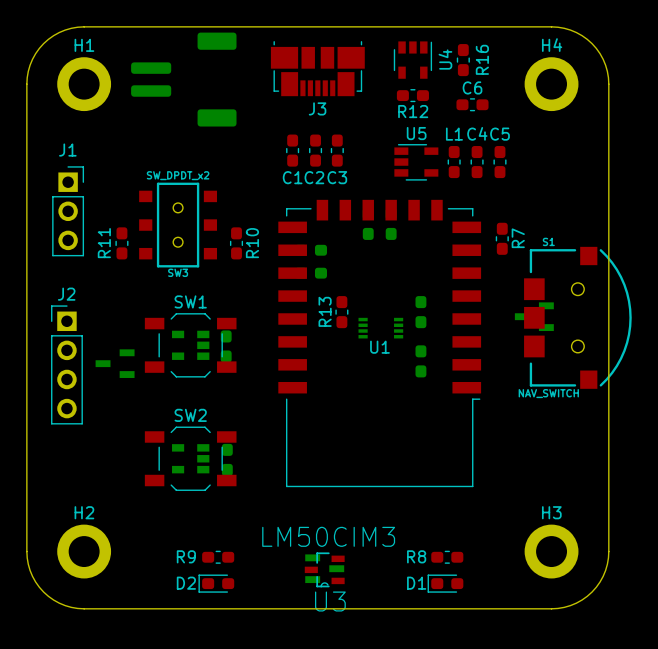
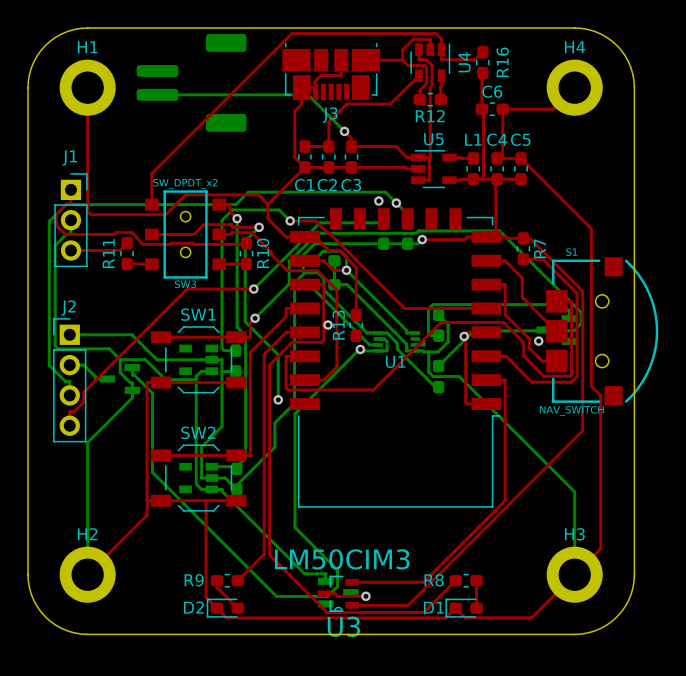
top track: none -> (418, 49) (418, 59) (426, 59) (432, 65) (429, 157)
top track: none -> (430, 49) (430, 39) (413, 39) (402, 49) (402, 60)
top track: none -> (482, 52) (475, 59) (441, 59) (441, 39) (435, 33) (291, 33) (151, 173) (151, 204)
top track: none -> (341, 60) (341, 75) (321, 75) (314, 82) (314, 87)
top track: none -> (402, 60) (408, 65) (424, 65) (426, 67) (426, 83) (419, 90) (419, 99)
top track: none -> (402, 60) (365, 60) (365, 65) (360, 71)
top track: none -> (482, 73) (483, 179)
top track: none -> (418, 75) (390, 104) (346, 104) (328, 122) (328, 146) (304, 146)
top track: none -> (441, 75) (440, 99)
top track: none -> (87, 87) (87, 211) (90, 214) (165, 214) (185, 194) (258, 194) (267, 204)
top track: none -> (314, 87) (301, 87) (301, 104) (294, 111) (294, 157) (304, 167)
top track: none -> (574, 87) (553, 109) (502, 109) (502, 158)
bottom track: none -> (157, 94) (307, 94) (344, 131)
top track: none -> (344, 131) (351, 138) (351, 146) (396, 146) (407, 157) (429, 157)
via: none -> (344, 131)
top track: none -> (429, 157) (429, 180) (418, 180)
top track: none -> (449, 157) (473, 158)
top track: none -> (497, 158) (521, 158) (591, 228) (591, 386) (600, 395) (600, 548) (531, 617) (465, 617) (455, 608) (445, 617) (226, 617) (206, 597) (206, 500)
top track: none -> (304, 167) (418, 168)
top track: none -> (304, 167) (267, 204)
top track: none -> (497, 179) (495, 236)
top track: none -> (521, 179) (449, 180)
top track: none -> (70, 189) (70, 203) (66, 203) (56, 214) (56, 225) (65, 234) (132, 232) (143, 244) (246, 243)
via: none -> (378, 201)
via: none -> (396, 203)
top track: none -> (219, 204) (230, 204) (230, 211) (237, 218)
top track: none -> (267, 204) (267, 218) (286, 236) (314, 236) (328, 250) (338, 250) (356, 267) (356, 314)
bottom track: none -> (237, 218) (237, 327) (245, 335) (245, 457) (236, 466)
via: none -> (237, 218)
bottom track: none -> (70, 220) (70, 234) (66, 234) (55, 245) (55, 346) (57, 348) (109, 348) (120, 359)
top track: none -> (290, 220) (315, 220) (404, 308) (486, 308)
bottom track: none -> (290, 220) (279, 209) (232, 209) (222, 220) (222, 348) (224, 350) (235, 350)
via: none -> (290, 220)
bottom track: none -> (383, 222) (320, 222) (253, 289)
bottom track: none -> (407, 222) (407, 214) (385, 192) (248, 192) (235, 204) (66, 204) (49, 221) (49, 365) (65, 381) (69, 381) (69, 395)
top track: none -> (259, 227) (203, 224) (193, 234) (151, 234)
bottom track: none -> (259, 227) (245, 241) (245, 321) (278, 354) (278, 399)
via: none -> (259, 227)
top track: none -> (219, 234) (251, 232) (287, 270) (317, 270) (336, 290) (336, 367) (323, 380) (304, 380)
top track: none -> (422, 239) (464, 239) (467, 236) (529, 238) (582, 291) (582, 430) (408, 605) (352, 605)
bottom track: none -> (422, 239) (418, 243) (314, 243) (303, 255) (304, 272)
via: none -> (422, 239)
top track: none -> (127, 243) (119, 250) (70, 250)
top track: none -> (523, 259) (542, 259) (576, 293) (576, 376) (571, 382) (531, 382) (506, 356) (486, 356)
top track: none -> (304, 260) (323, 260) (333, 270) (346, 270)
bottom track: none -> (313, 260) (323, 251) (340, 251) (346, 257) (346, 270) (406, 330) (406, 332) (415, 332)
bottom track: none -> (334, 260) (334, 284) (347, 284) (406, 344) (406, 350) (438, 351) (448, 341) (448, 324) (438, 314)
top track: none -> (486, 260) (505, 260) (522, 277) (522, 297) (556, 331)
top track: none -> (127, 264) (151, 264)
top track: none -> (246, 264) (219, 264)
via: none -> (346, 270)
bottom track: none -> (304, 272) (317, 272) (324, 278) (324, 290) (366, 332) (387, 332) (397, 343) (397, 349) (435, 387) (438, 387)
bottom track: none -> (304, 272) (294, 283) (294, 403) (274, 423) (274, 447) (234, 487)
top track: none -> (304, 284) (323, 284) (323, 340) (321, 342) (292, 342) (269, 365) (269, 555) (326, 612) (423, 612) (455, 580)
bottom track: none -> (313, 284) (313, 288) (369, 344) (378, 344)
top track: none -> (486, 284) (505, 284) (505, 314) (529, 338) (529, 348) (542, 361) (556, 361)
top track: none -> (253, 289) (187, 289) (83, 392) (83, 402) (74, 411) (69, 411) (69, 425)
via: none -> (253, 289)
top track: none -> (556, 301) (571, 301) (571, 374) (569, 376) (544, 376) (523, 356) (523, 342) (503, 322) (441, 322) (373, 389) (287, 389) (286, 388) (286, 356) (304, 356)
top track: none -> (304, 308) (286, 308) (286, 316) (250, 352) (250, 455) (161, 455)
top track: none -> (255, 318) (250, 323) (250, 337) (161, 337)
bottom track: none -> (255, 318) (289, 284) (289, 261) (317, 233) (416, 233) (418, 230) (499, 230) (581, 312) (581, 323) (574, 330) (473, 330) (438, 366)
via: none -> (255, 318)
bottom track: none -> (569, 318) (569, 311) (562, 304) (433, 304) (428, 309) (428, 332) (431, 335) (438, 335)
via: none -> (328, 325)
top track: none -> (304, 332) (286, 332) (264, 354) (264, 554) (237, 580)
top track: none -> (486, 332) (467, 332) (465, 334) (465, 402) (467, 404) (486, 404)
bottom track: none -> (69, 334) (132, 334) (157, 359) (222, 359) (222, 426) (201, 447) (201, 478) (225, 478) (236, 489)
via: none -> (464, 336)
bottom track: none -> (378, 338) (384, 338) (387, 341) (387, 350) (358, 350) (294, 414) (294, 527) (337, 569) (337, 586) (327, 596) (276, 596) (152, 472) (152, 393) (132, 375) (132, 367)
bottom track: none -> (424, 338) (424, 344) (415, 344)
via: none -> (538, 341)
via: none -> (360, 349)
bottom track: none -> (428, 351) (428, 372) (433, 376) (459, 376) (574, 491) (574, 574)
bottom track: none -> (120, 359) (120, 372) (132, 382) (132, 397) (87, 442) (87, 574)
bottom track: none -> (120, 359) (145, 359) (165, 379) (196, 379)
bottom track: none -> (69, 365) (83, 365) (95, 378) (107, 378)
bottom track: none -> (211, 371) (201, 371) (196, 376) (196, 483) (201, 489) (222, 489) (304, 573) (325, 573) (325, 581)
bottom track: none -> (222, 371) (235, 371)
top track: none -> (486, 380) (505, 380) (505, 500) (423, 582) (352, 582)
top track: none -> (236, 382) (147, 382) (147, 515) (87, 574)
via: none -> (278, 399)
bottom track: none -> (211, 466) (236, 466)
top track: none -> (147, 500) (236, 500)
top track: none -> (216, 580) (216, 587) (237, 608)
top track: none -> (476, 580) (476, 608)
top track: none -> (324, 593) (335, 593) (337, 596) (365, 596)
via: none -> (365, 596)

